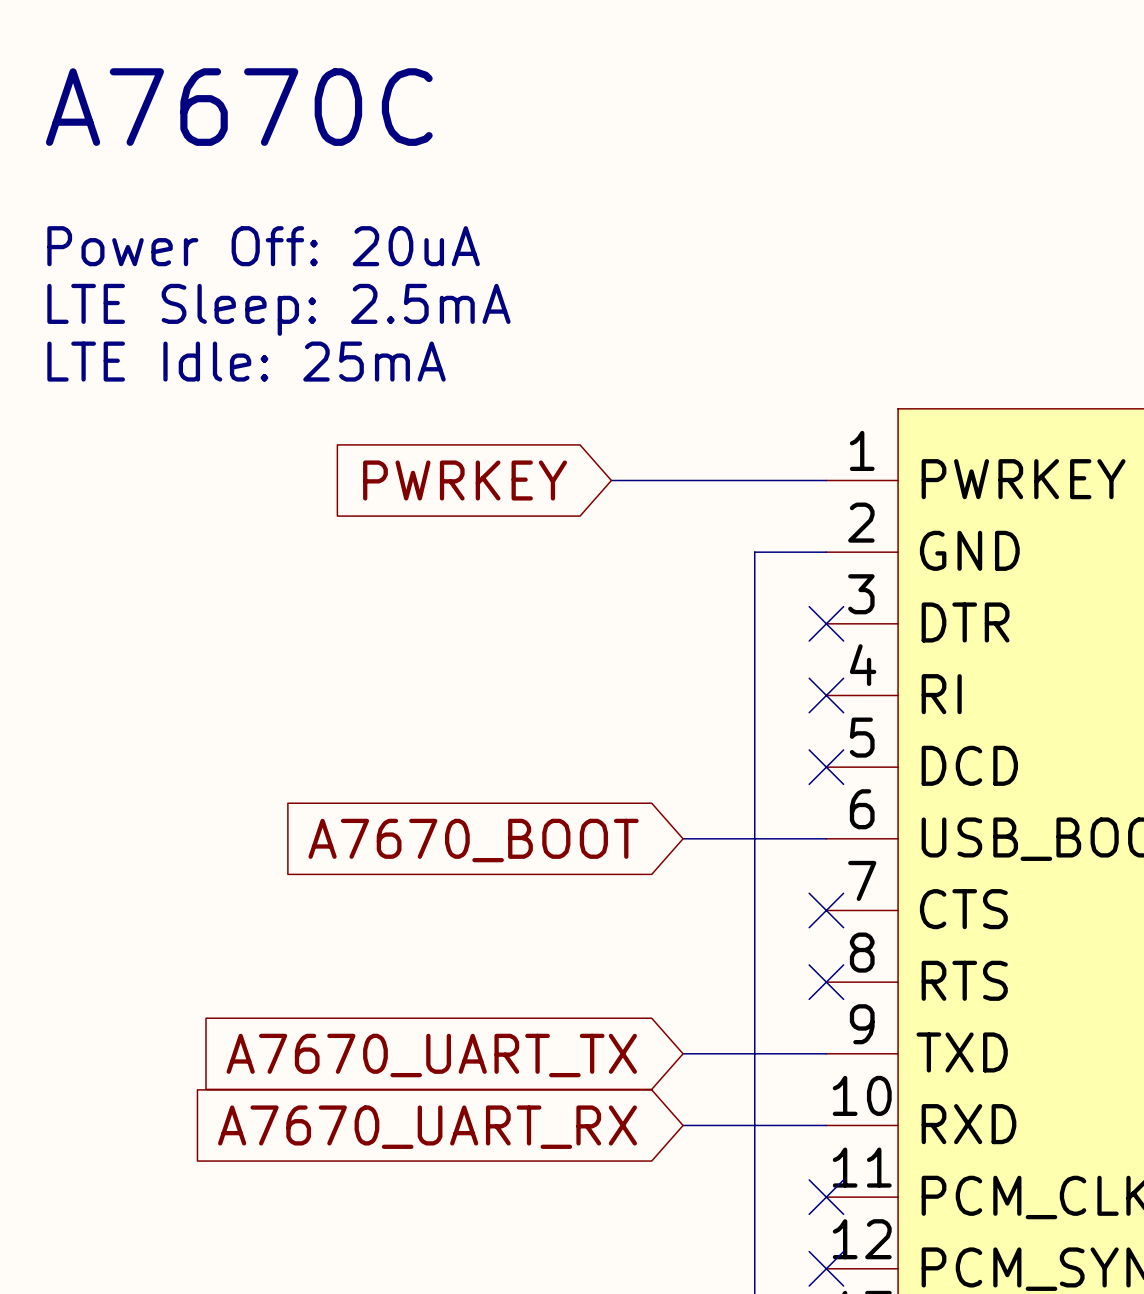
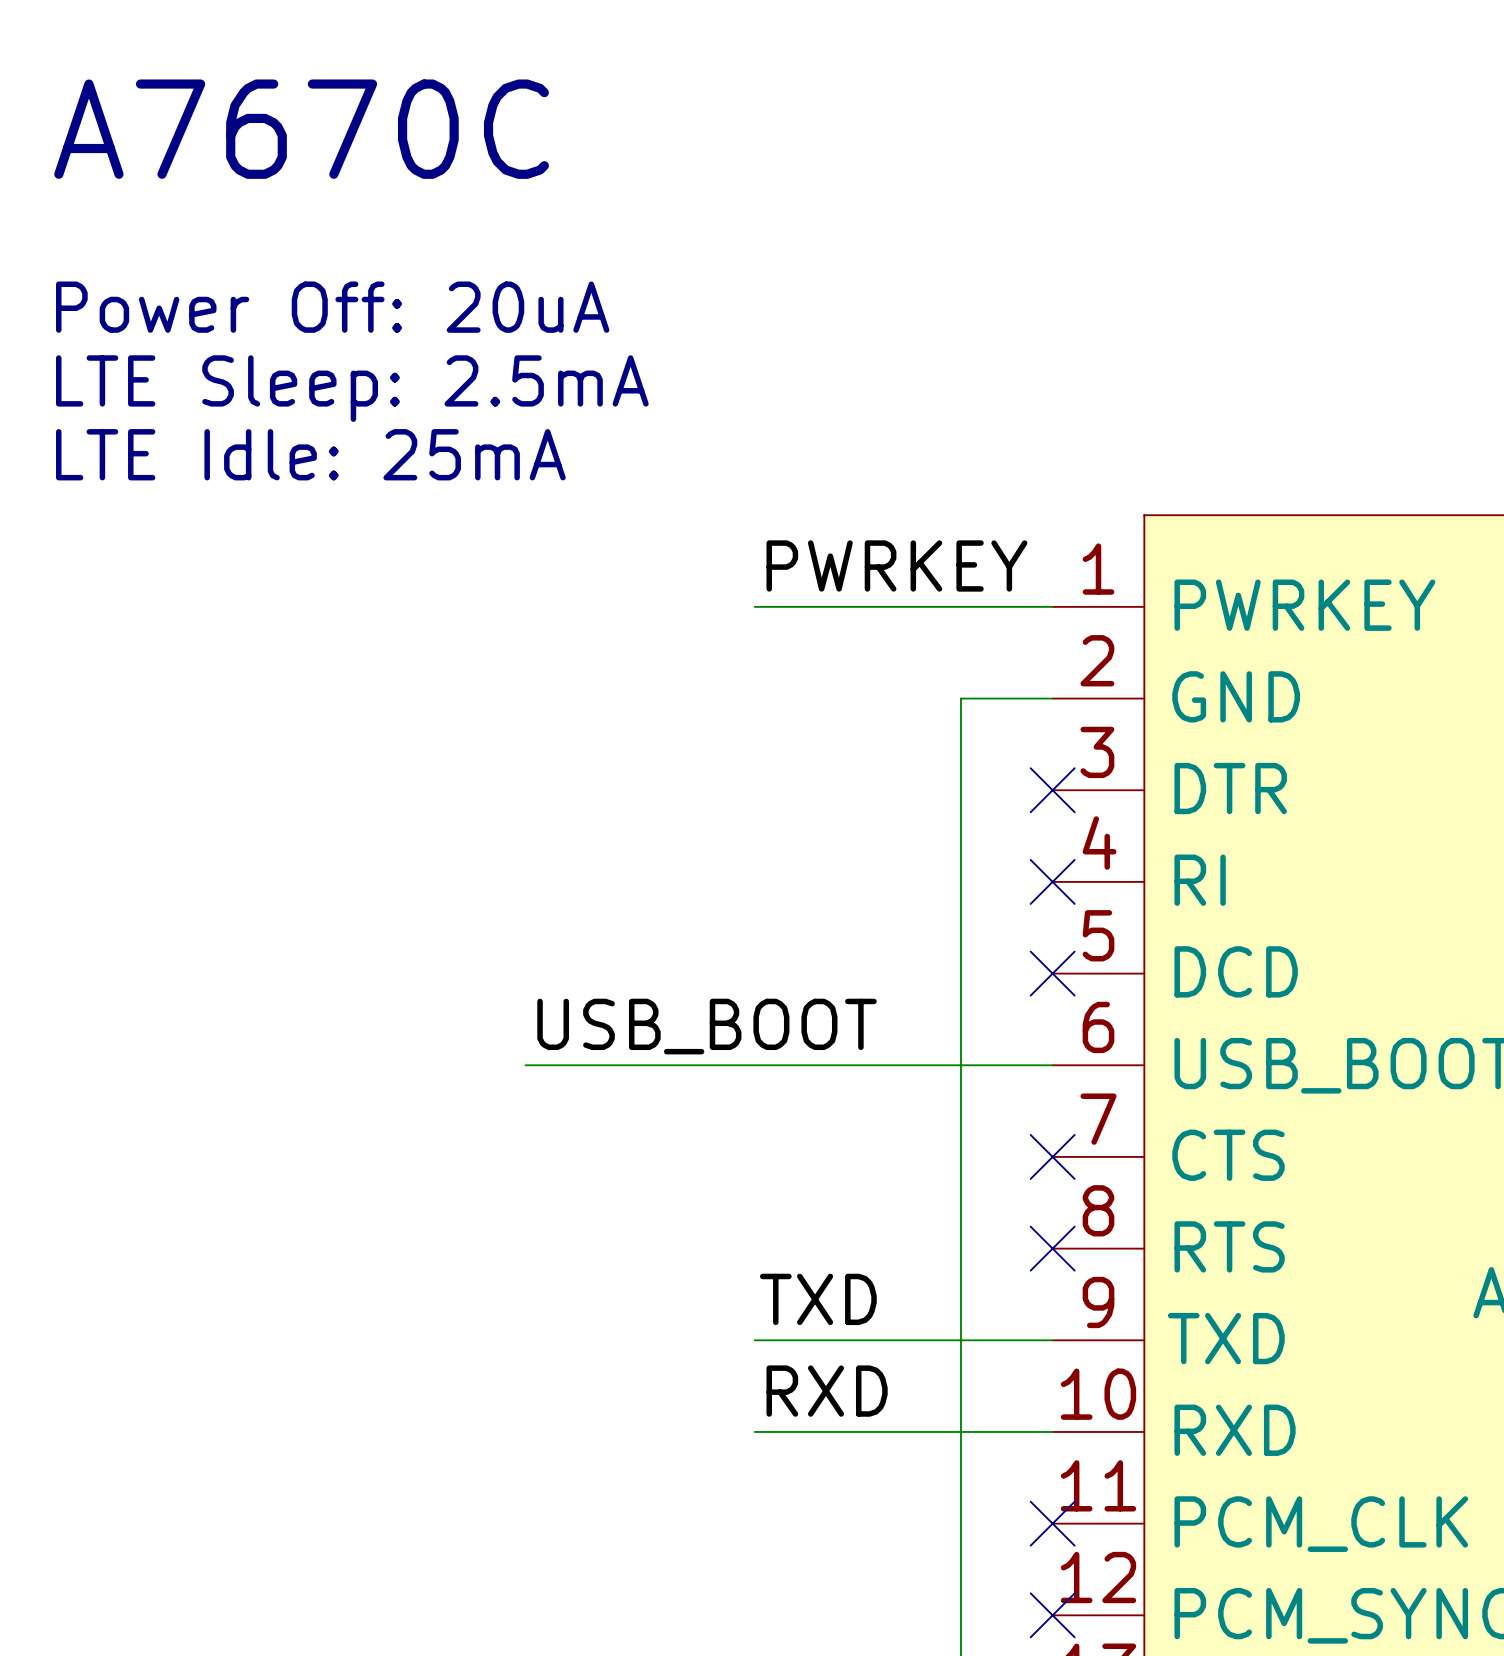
label: none -> PWRKEY (896, 565)
global label: PWRKEY (465, 480) -> none
wire: none -> (754, 606) (777, 606)
label: none -> USB_BOOT (707, 1026)
wire: none -> (525, 1065) (869, 1065)
global label: A7670_BOOT (473, 840) -> none
label: none -> TXD (818, 1299)
wire: none -> (754, 1340) (869, 1340)
global label: A7670_UART_TX (431, 1055) -> none
label: none -> RXD (827, 1391)
wire: none -> (754, 1431) (869, 1431)
global label: A7670_UART_RX (427, 1127) -> none

